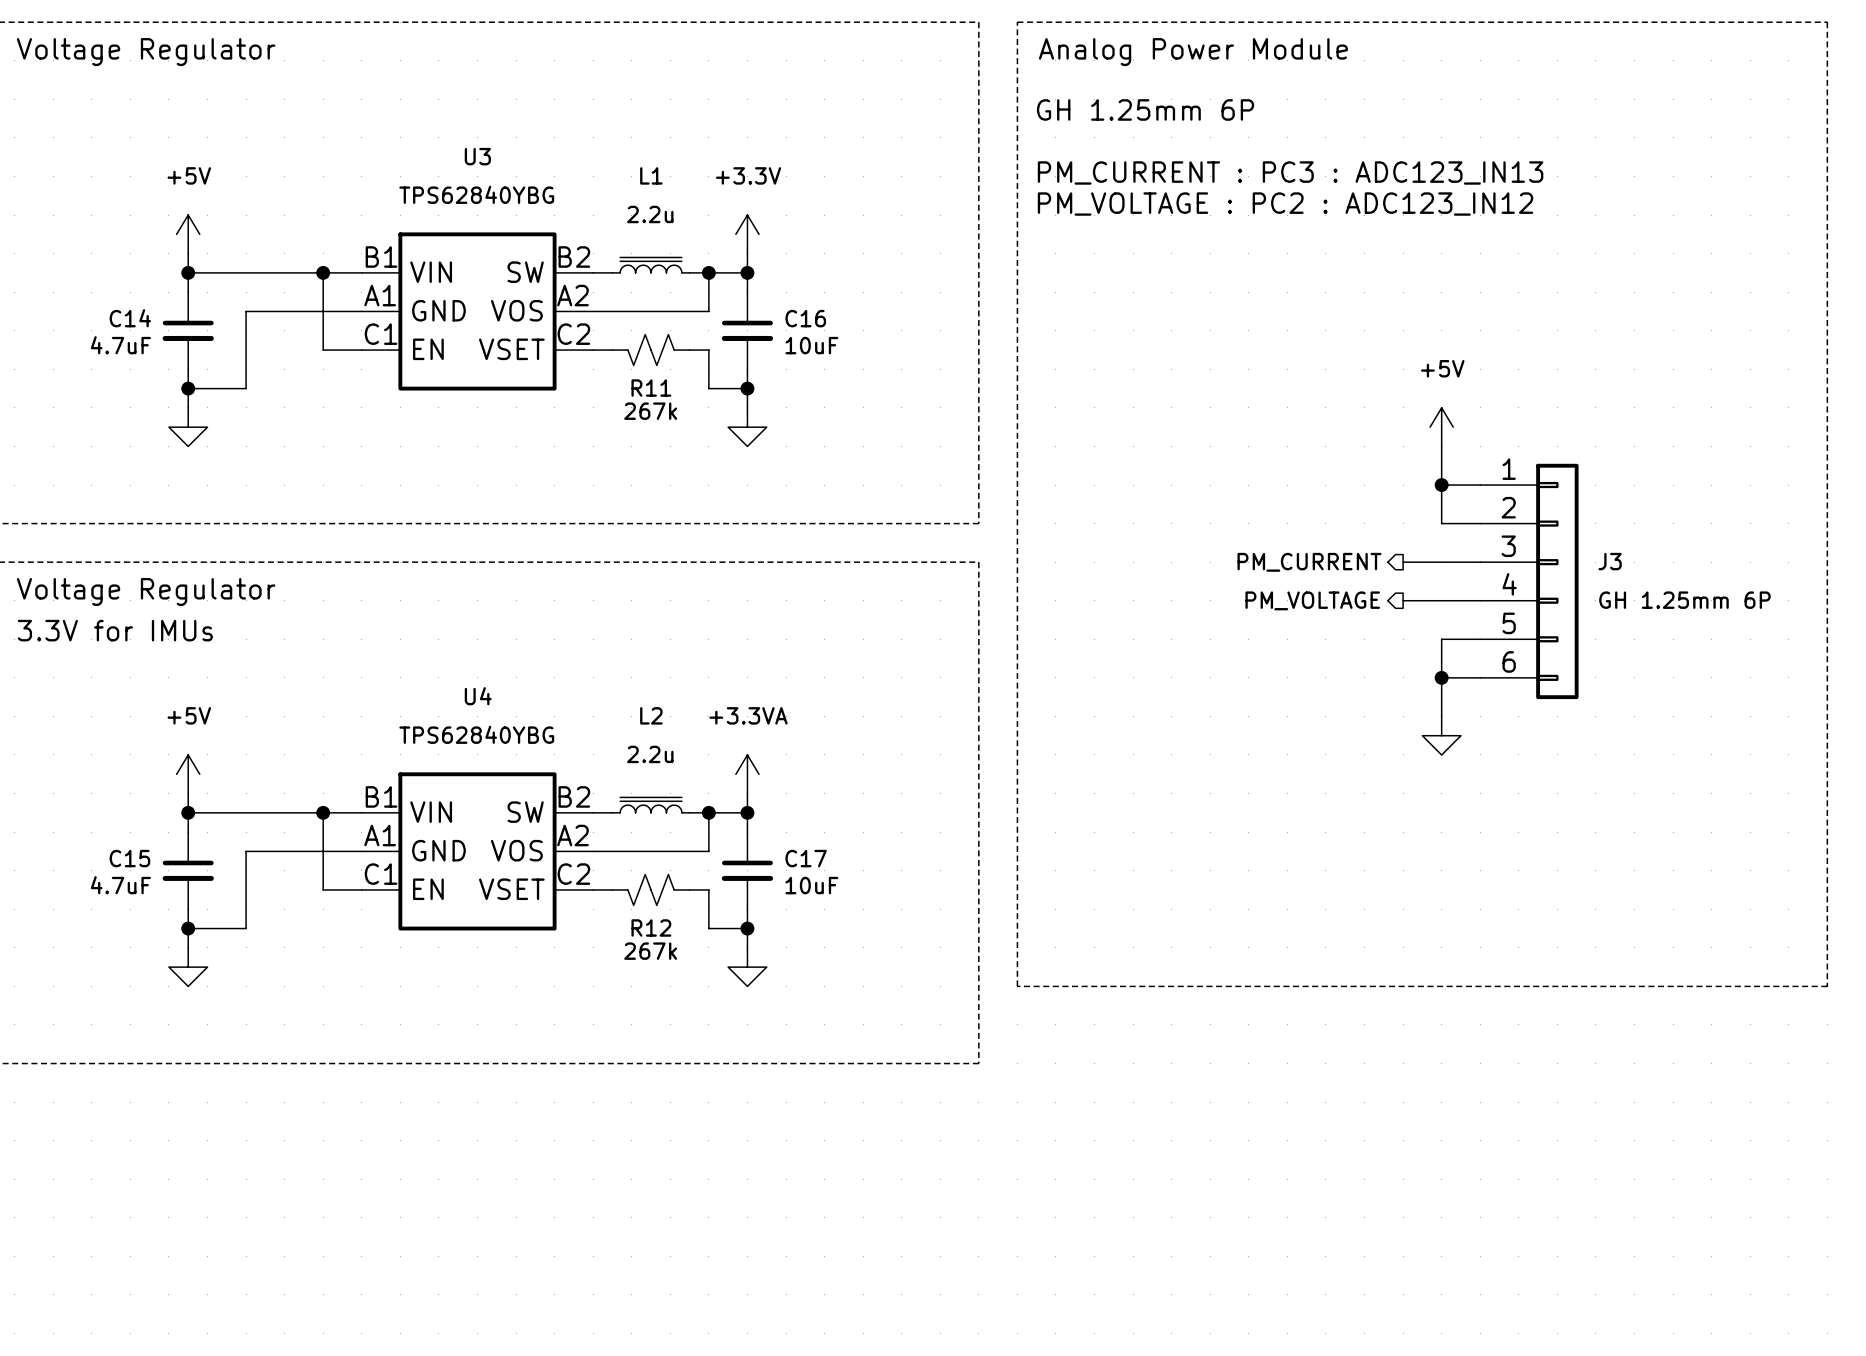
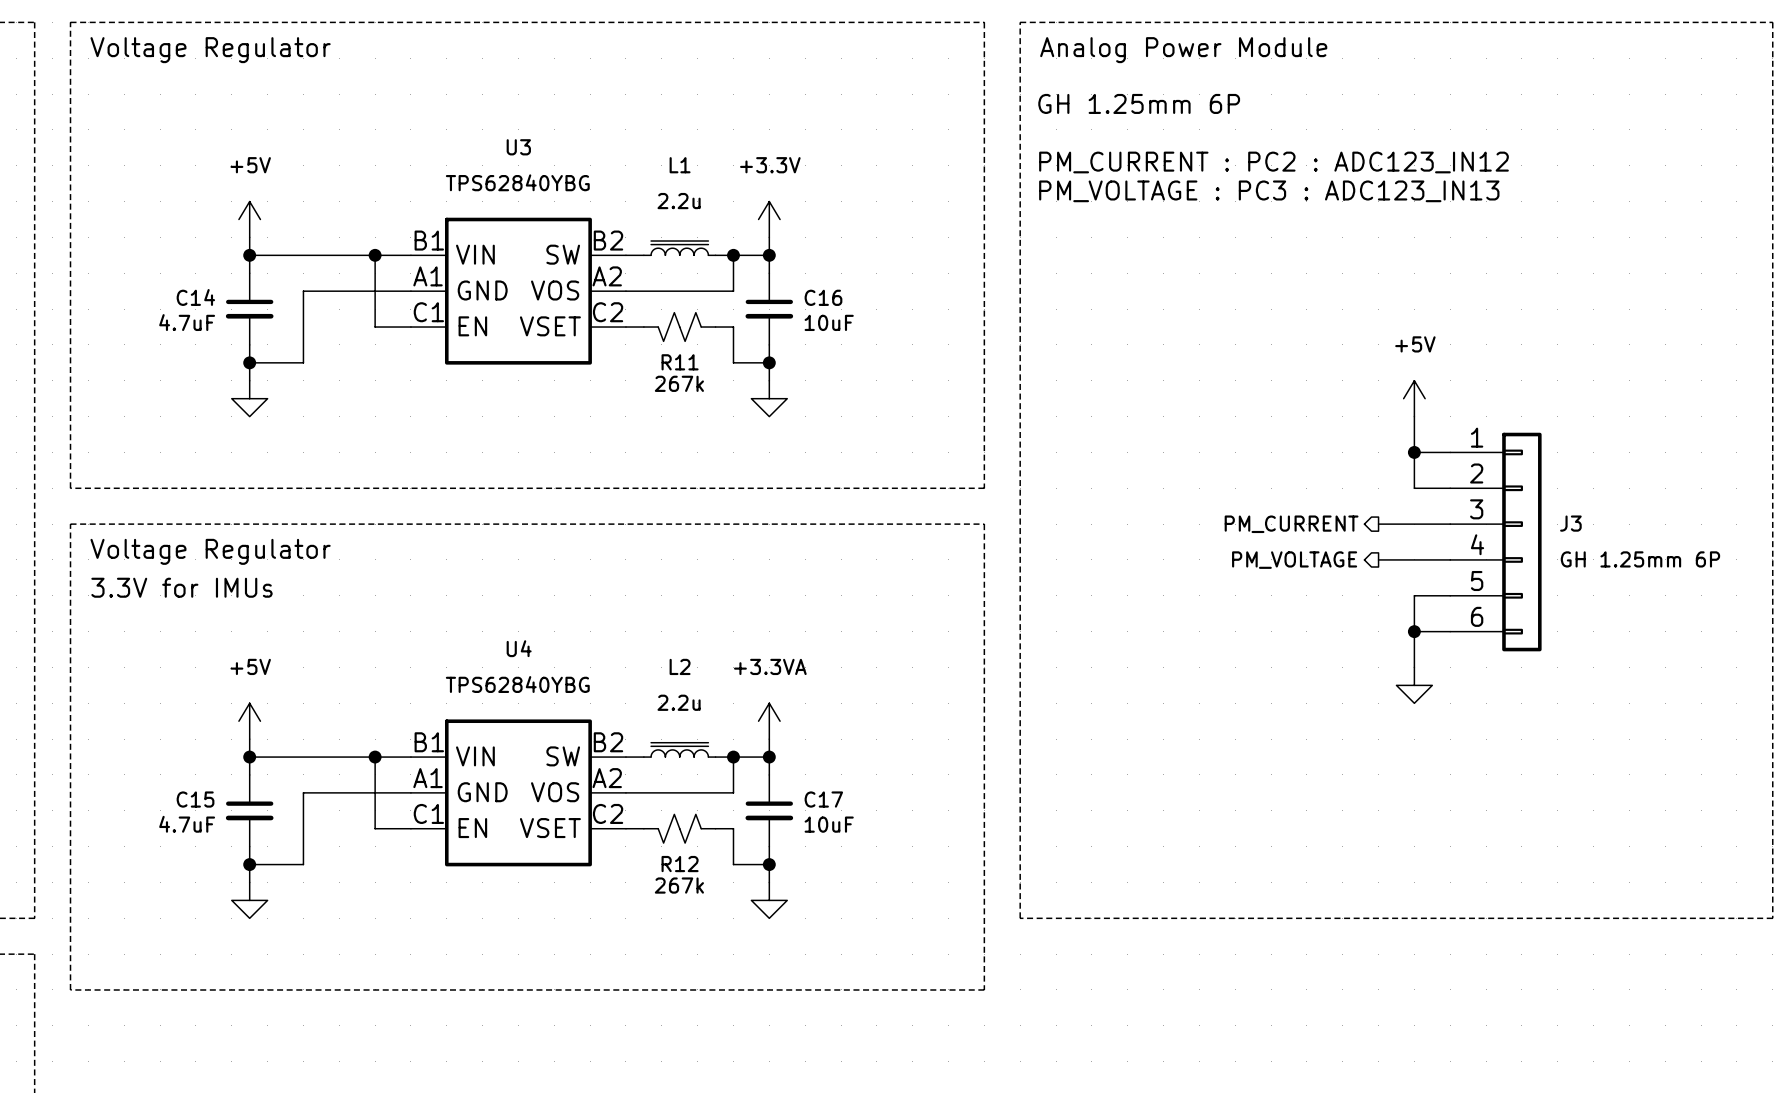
text: PM_CURRENT : PC3 : ADC123_IN13 (1290, 172) -> PM_CURRENT : PC2 : ADC123_IN12 (1273, 162)
text: PM_VOLTAGE : PC2 : ADC123_IN12 (1285, 204) -> PM_VOLTAGE : PC3 : ADC123_IN13 (1269, 191)

